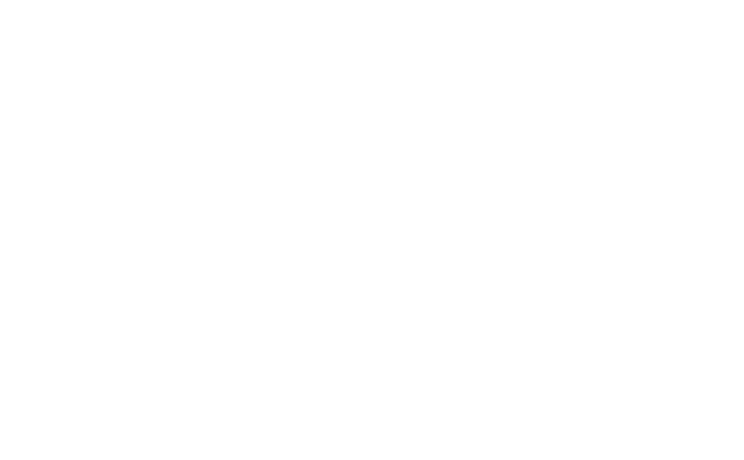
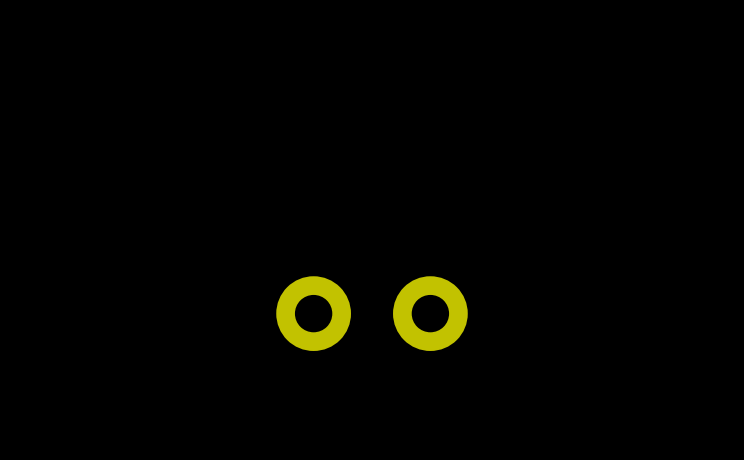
part: none -> (372, 313)

